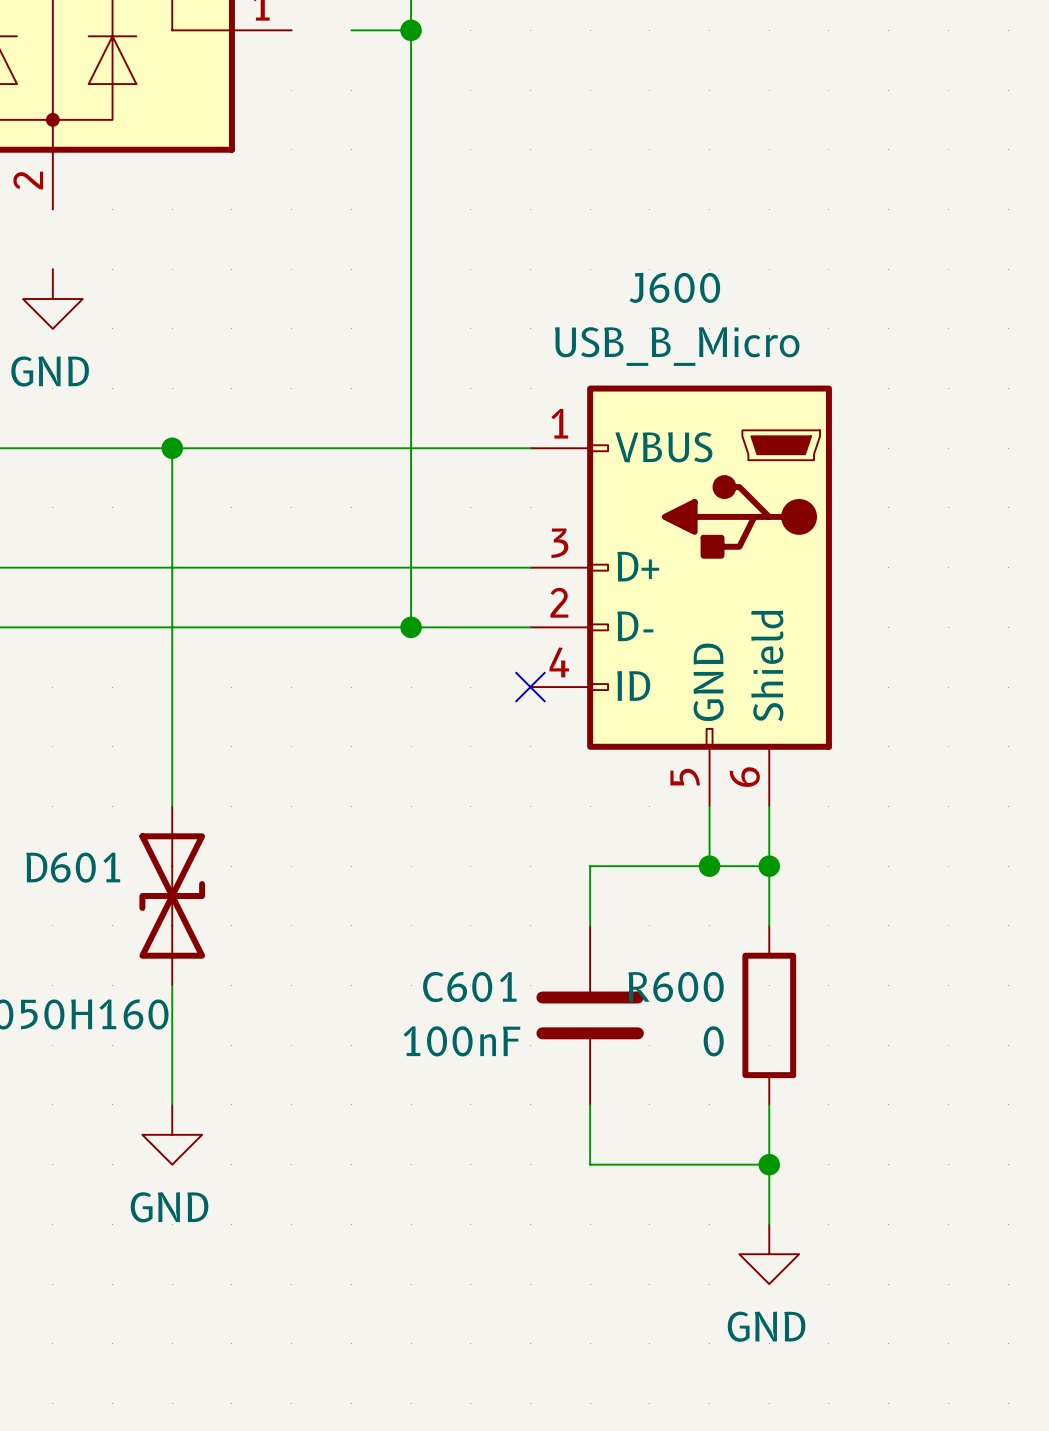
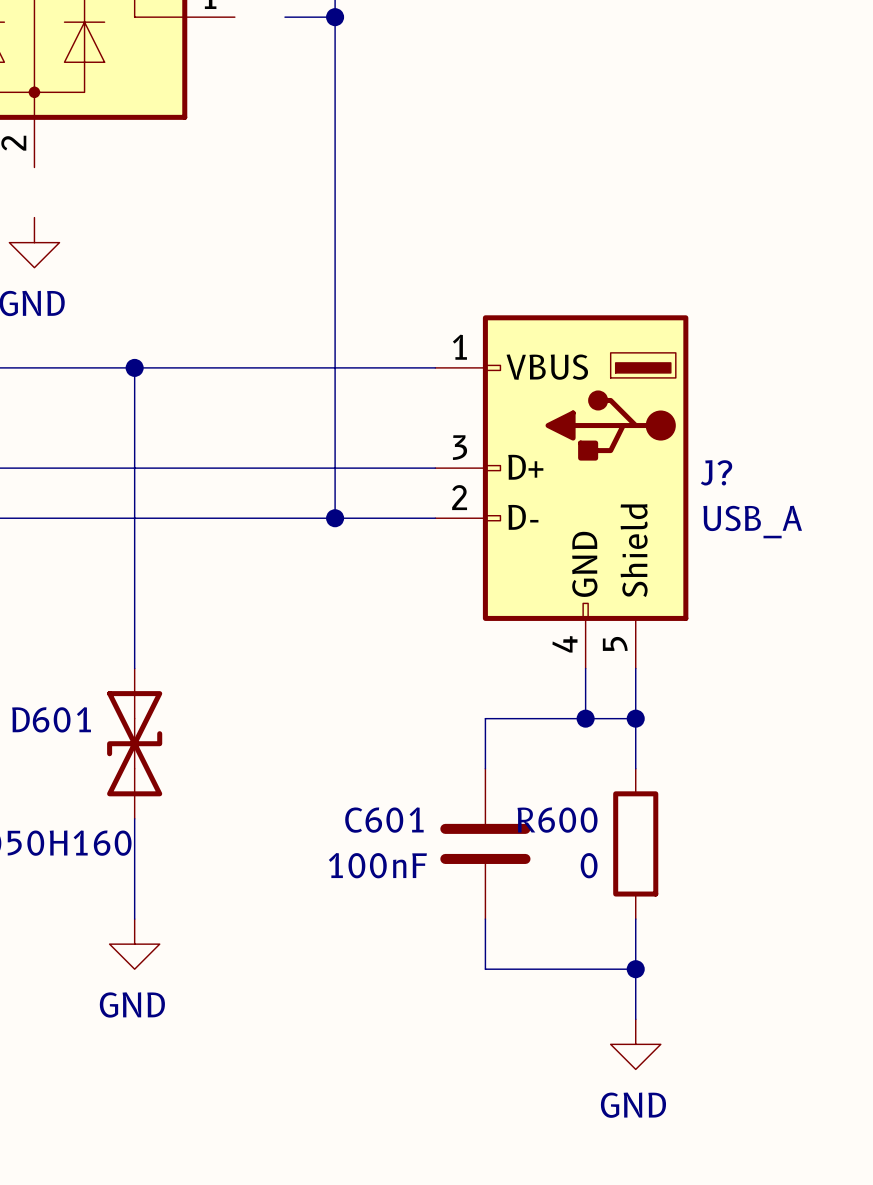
J600: USB_B_Micro (681, 596) -> none
J?: none -> USB_A (561, 491)
no-connect mark: (530, 687) -> none

